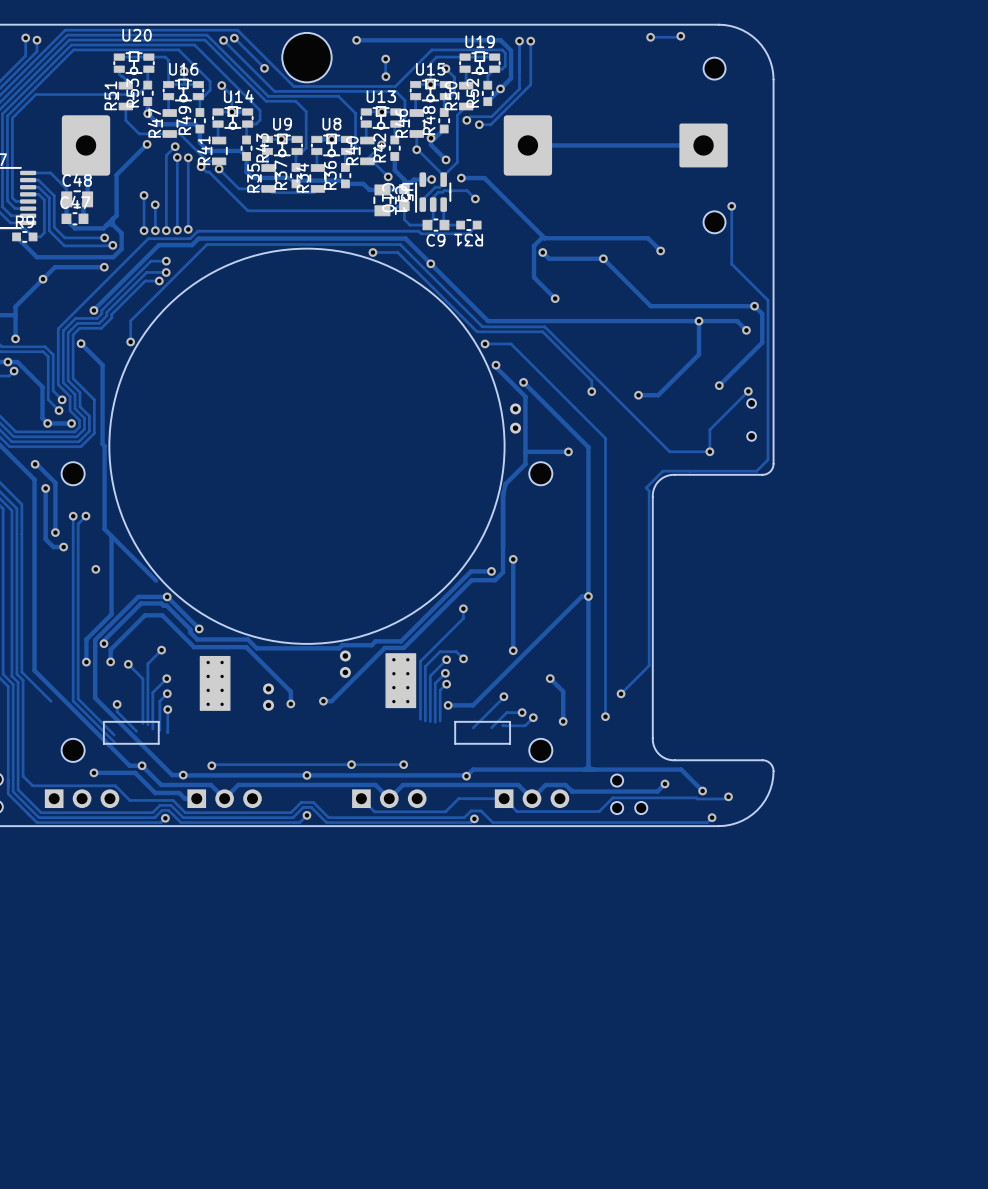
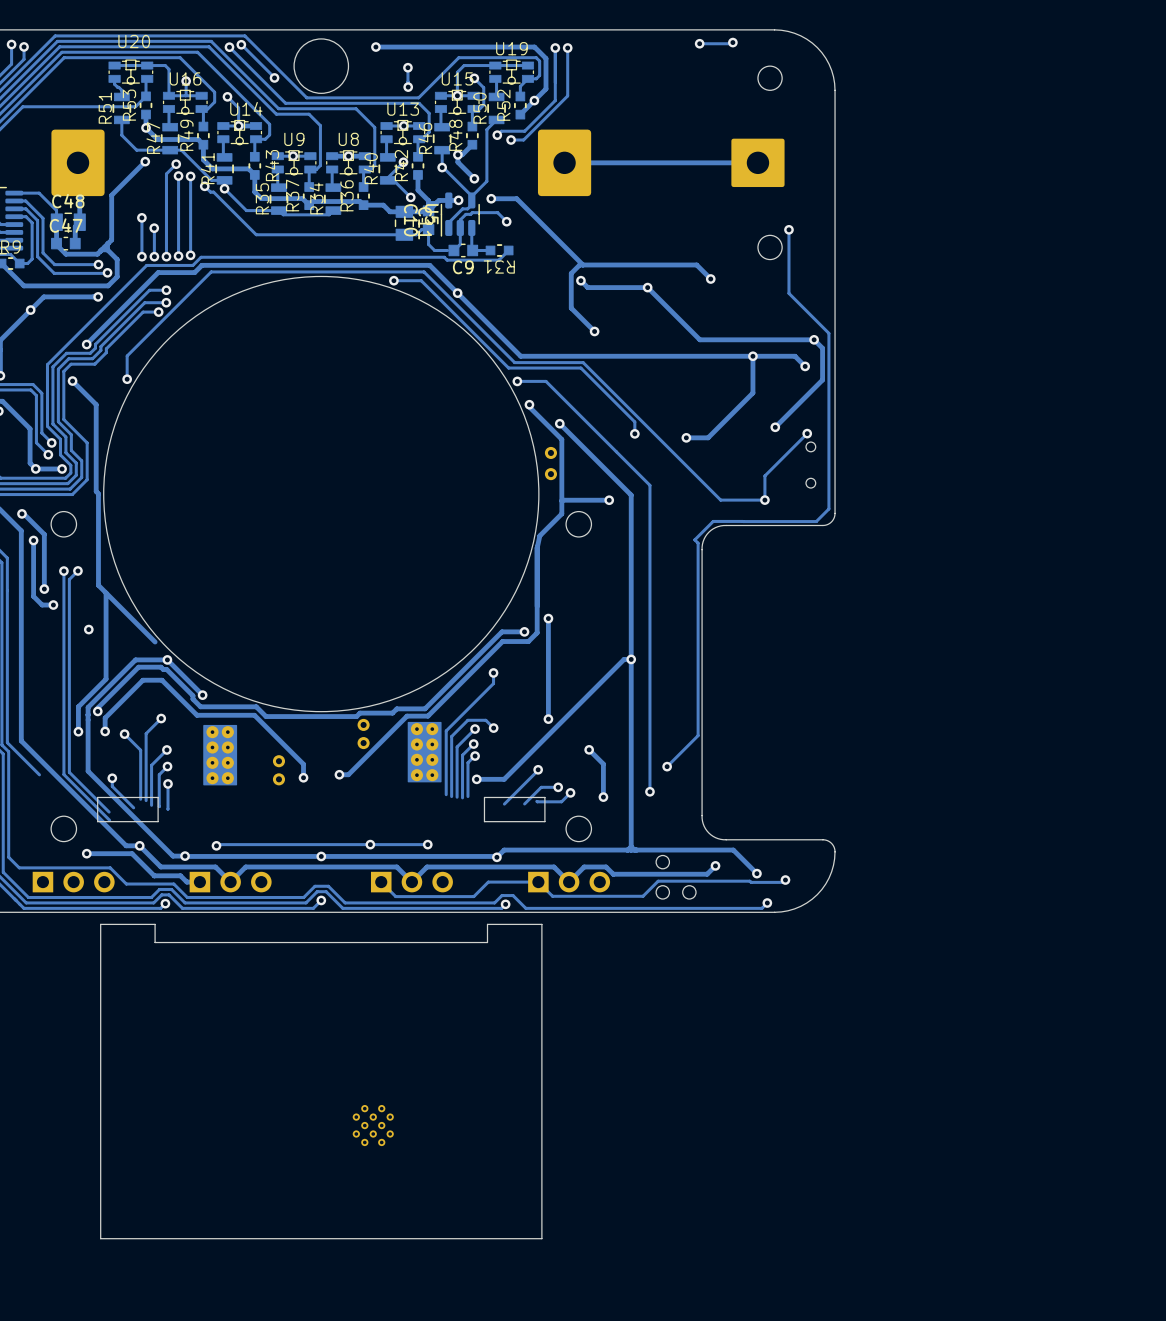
board edge: none -> (541, 924) (541, 1238) (100, 1238) (100, 924) (155, 924) (155, 942) (487, 942) (487, 924) (541, 924)
part: none -> (373, 1125)

